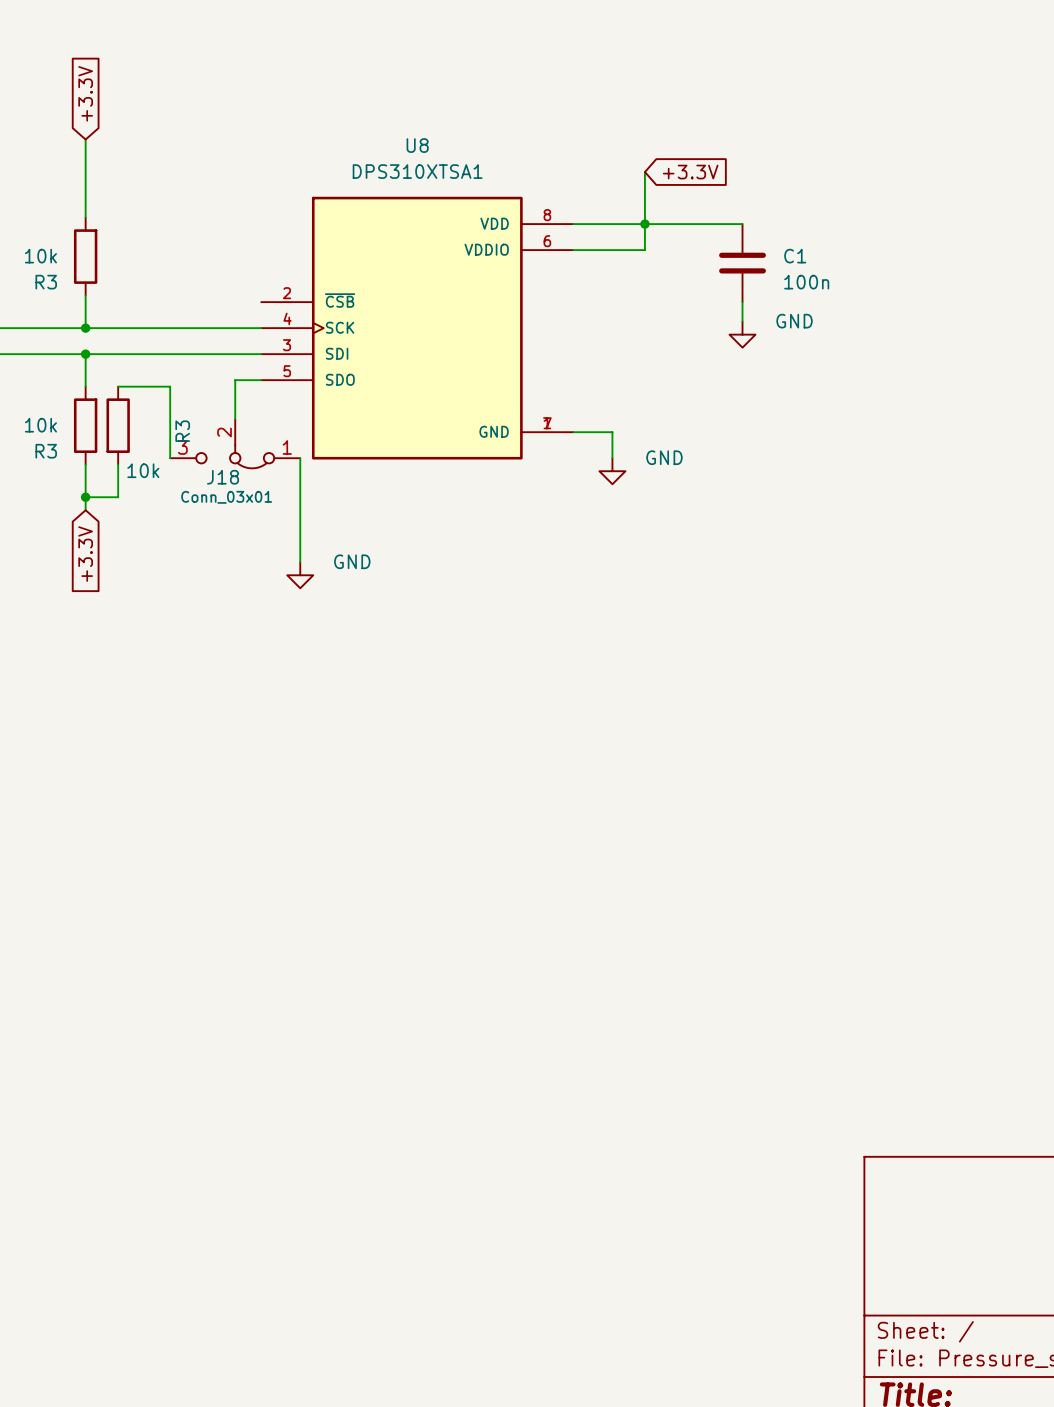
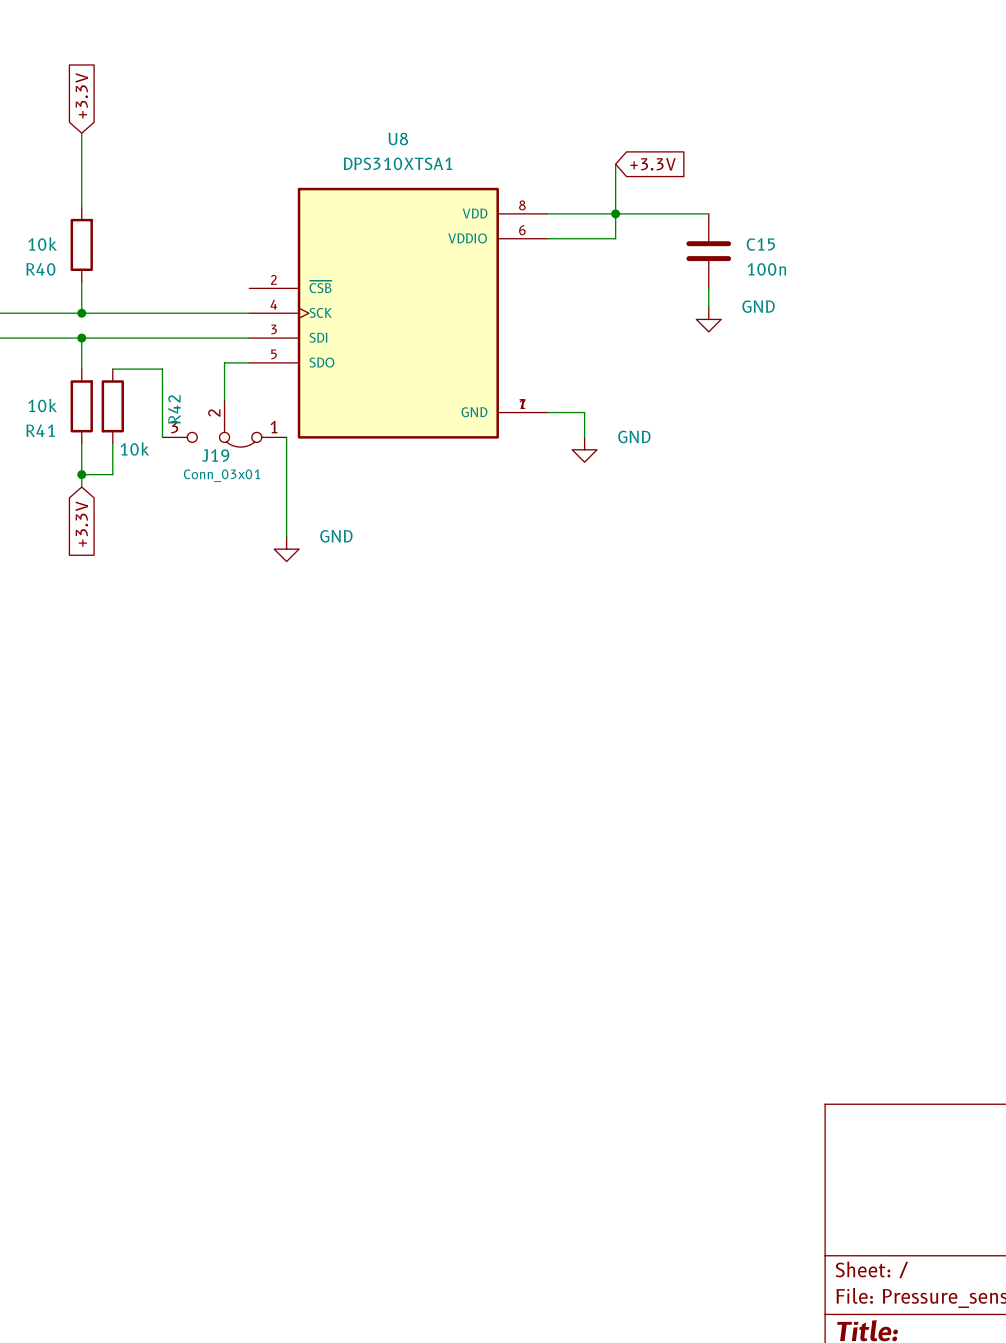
C1 name: C1 (795, 256) -> C15 (760, 244)
R3 name: R3 (46, 282) -> R40 (40, 269)
R3 name: R3 (182, 431) -> R42 (174, 409)
R3 name: R3 (46, 451) -> R41 (40, 430)
J18 name: J18 (223, 477) -> J19 (215, 455)

